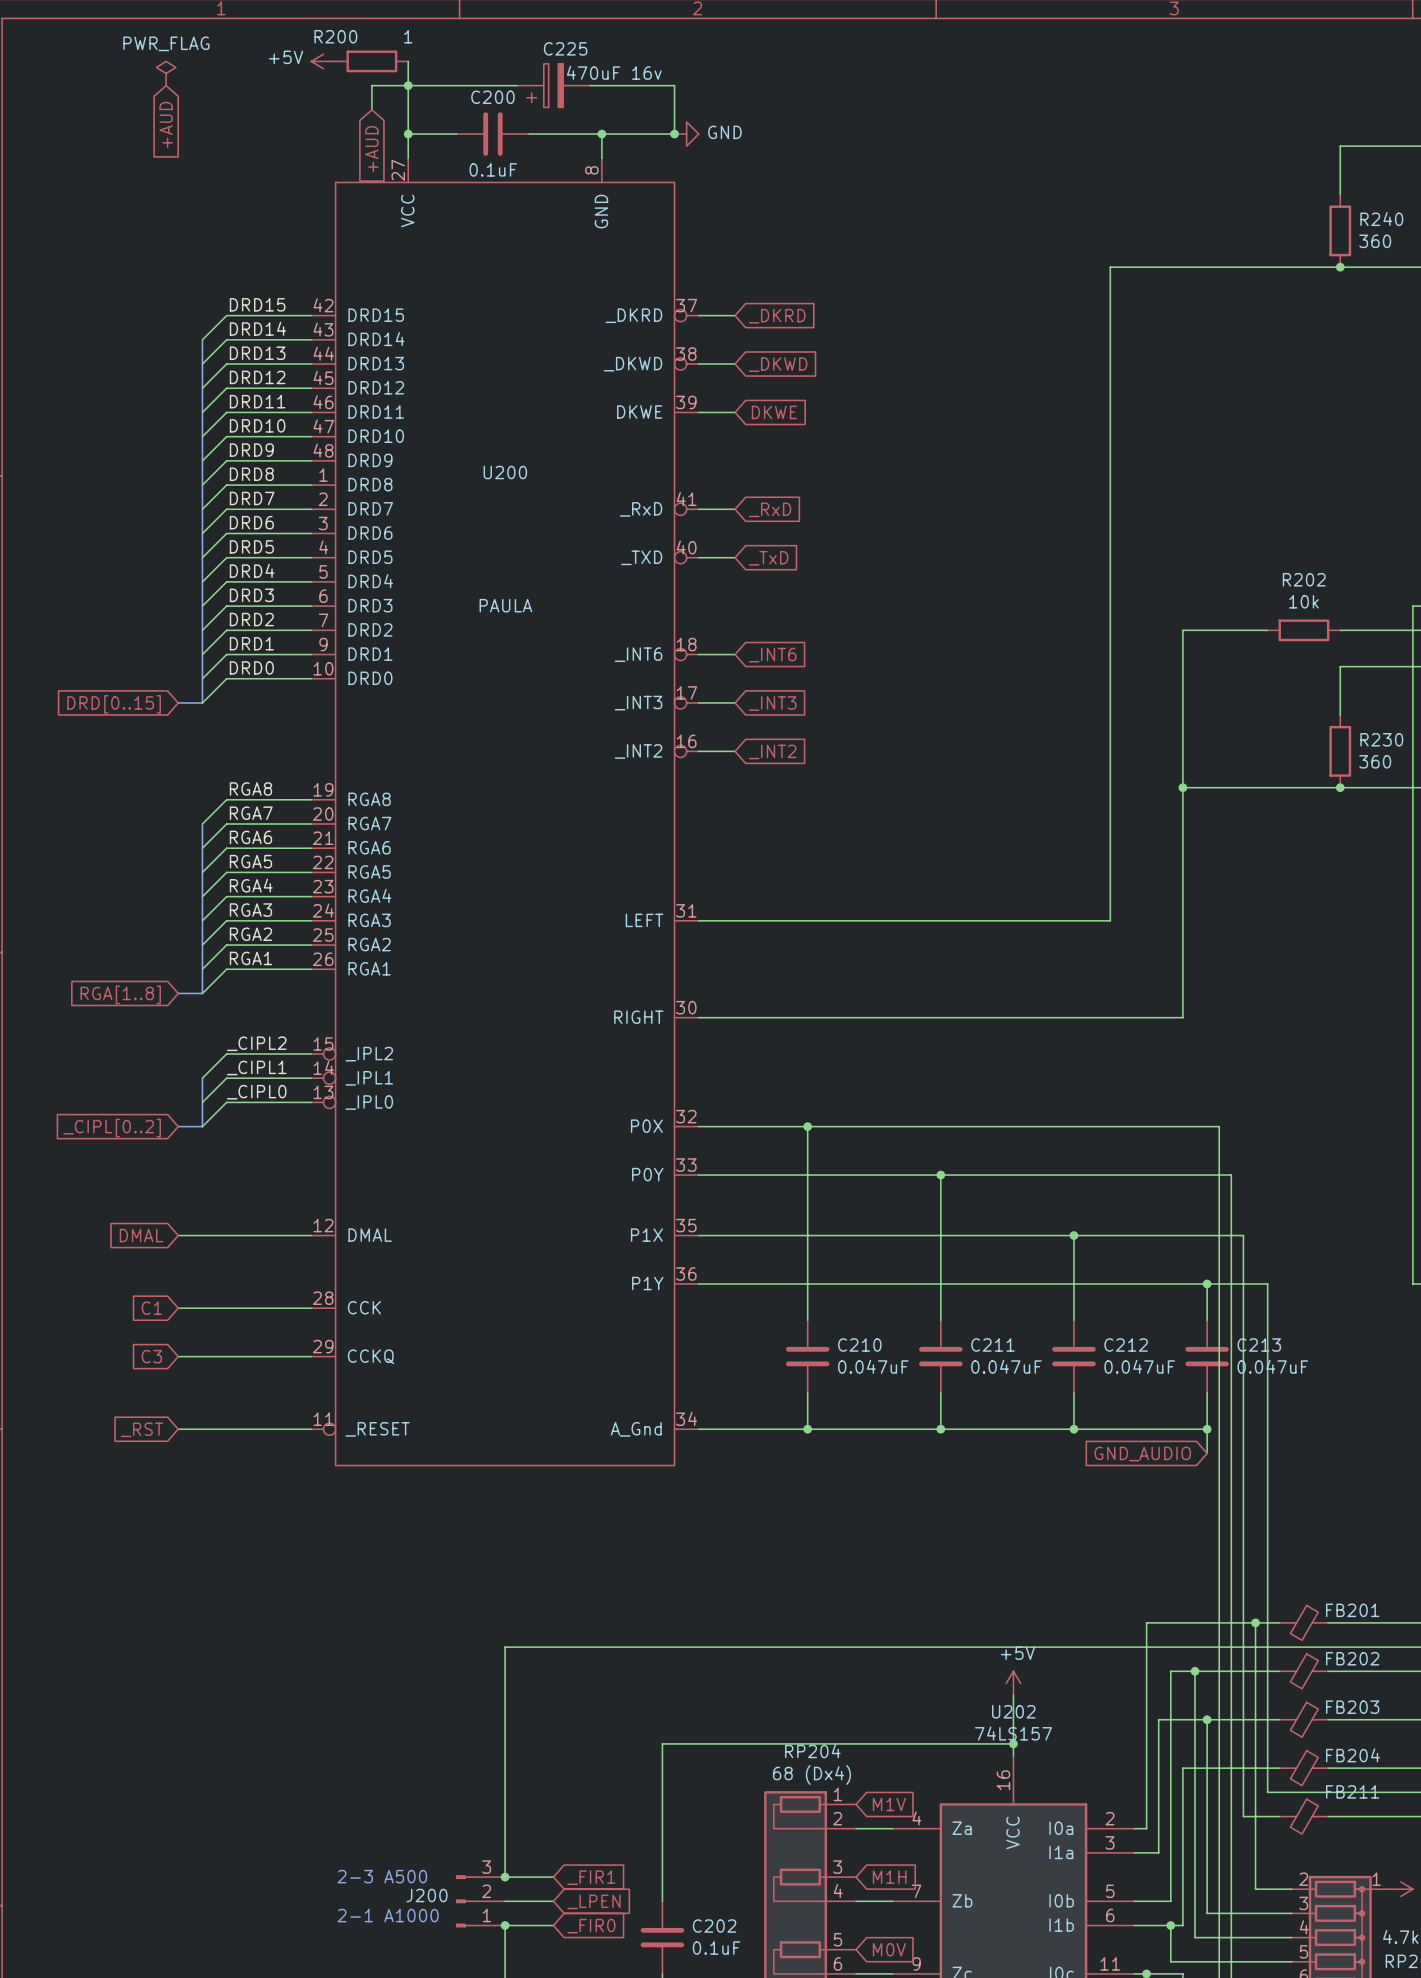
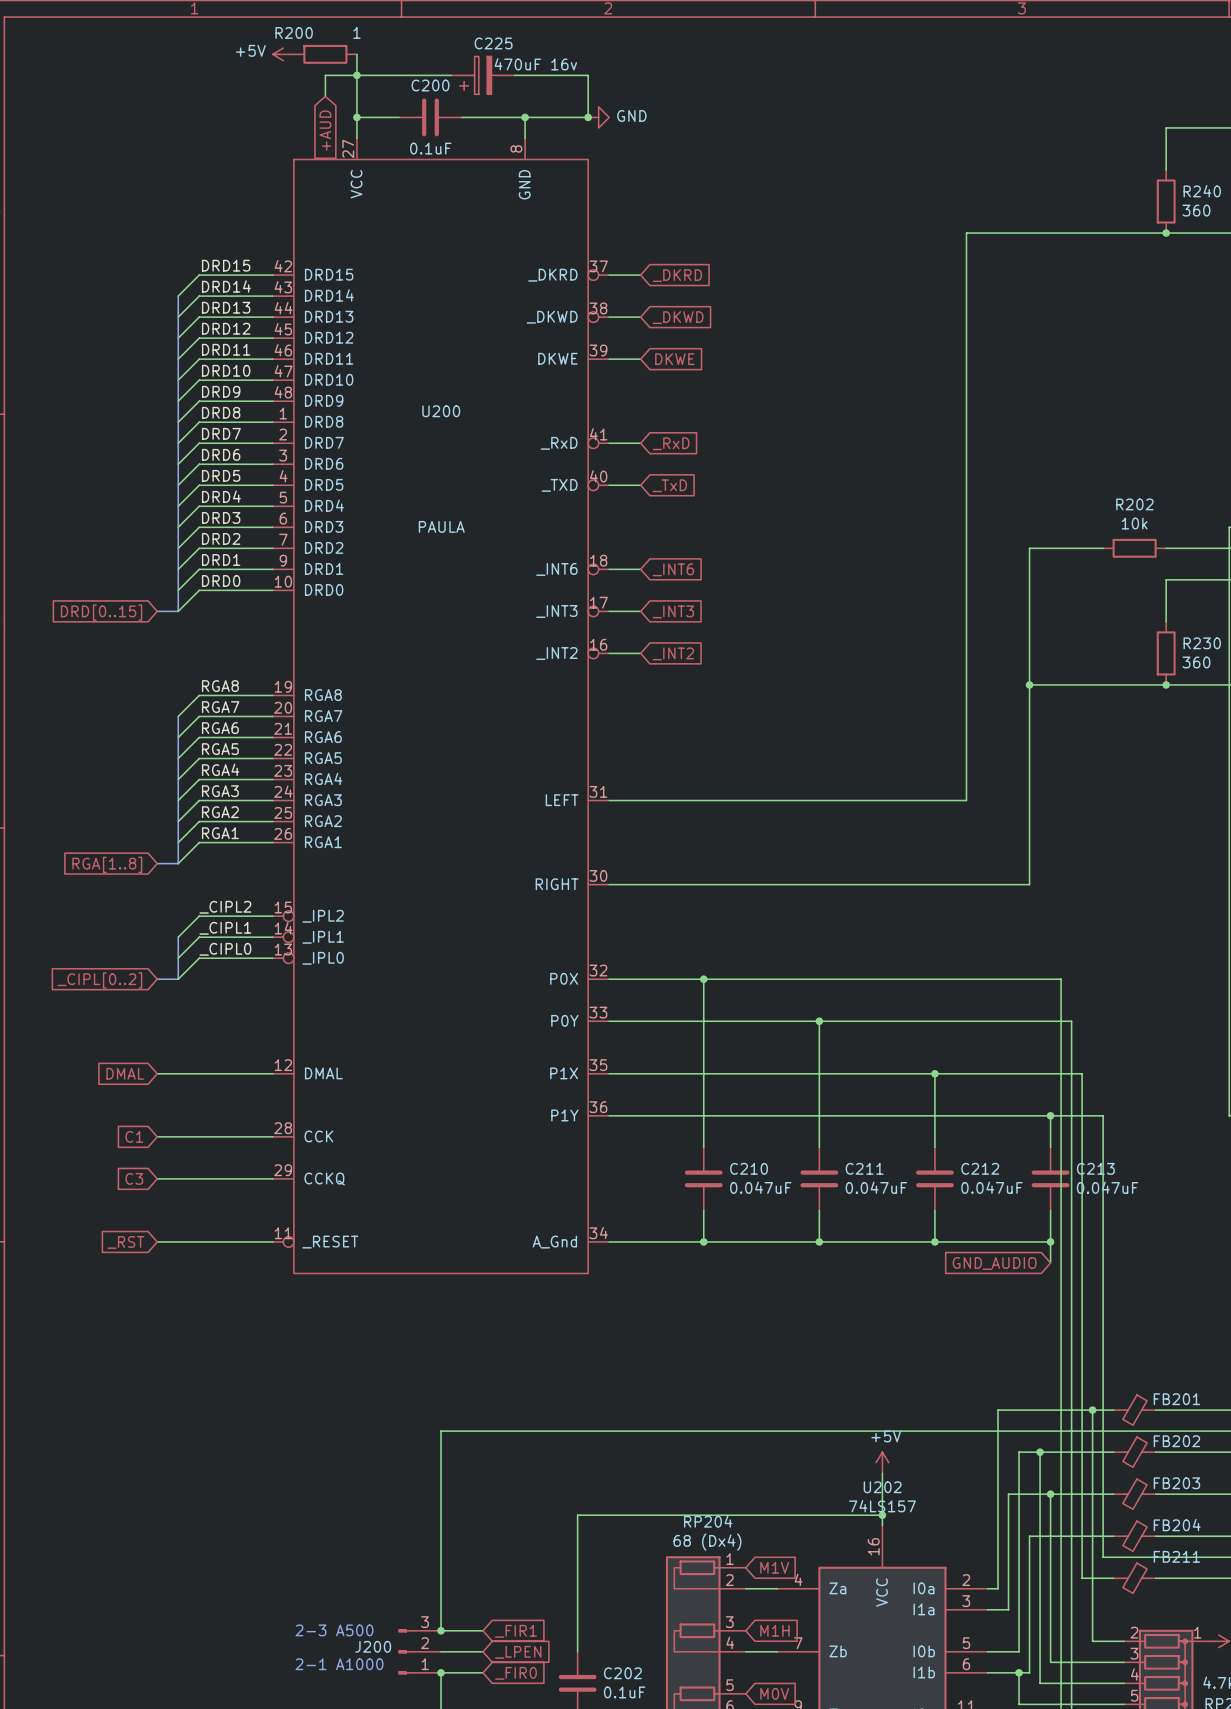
power symbol: PWR_FLAG (166, 73) -> none
global label: +AUD (166, 124) -> none

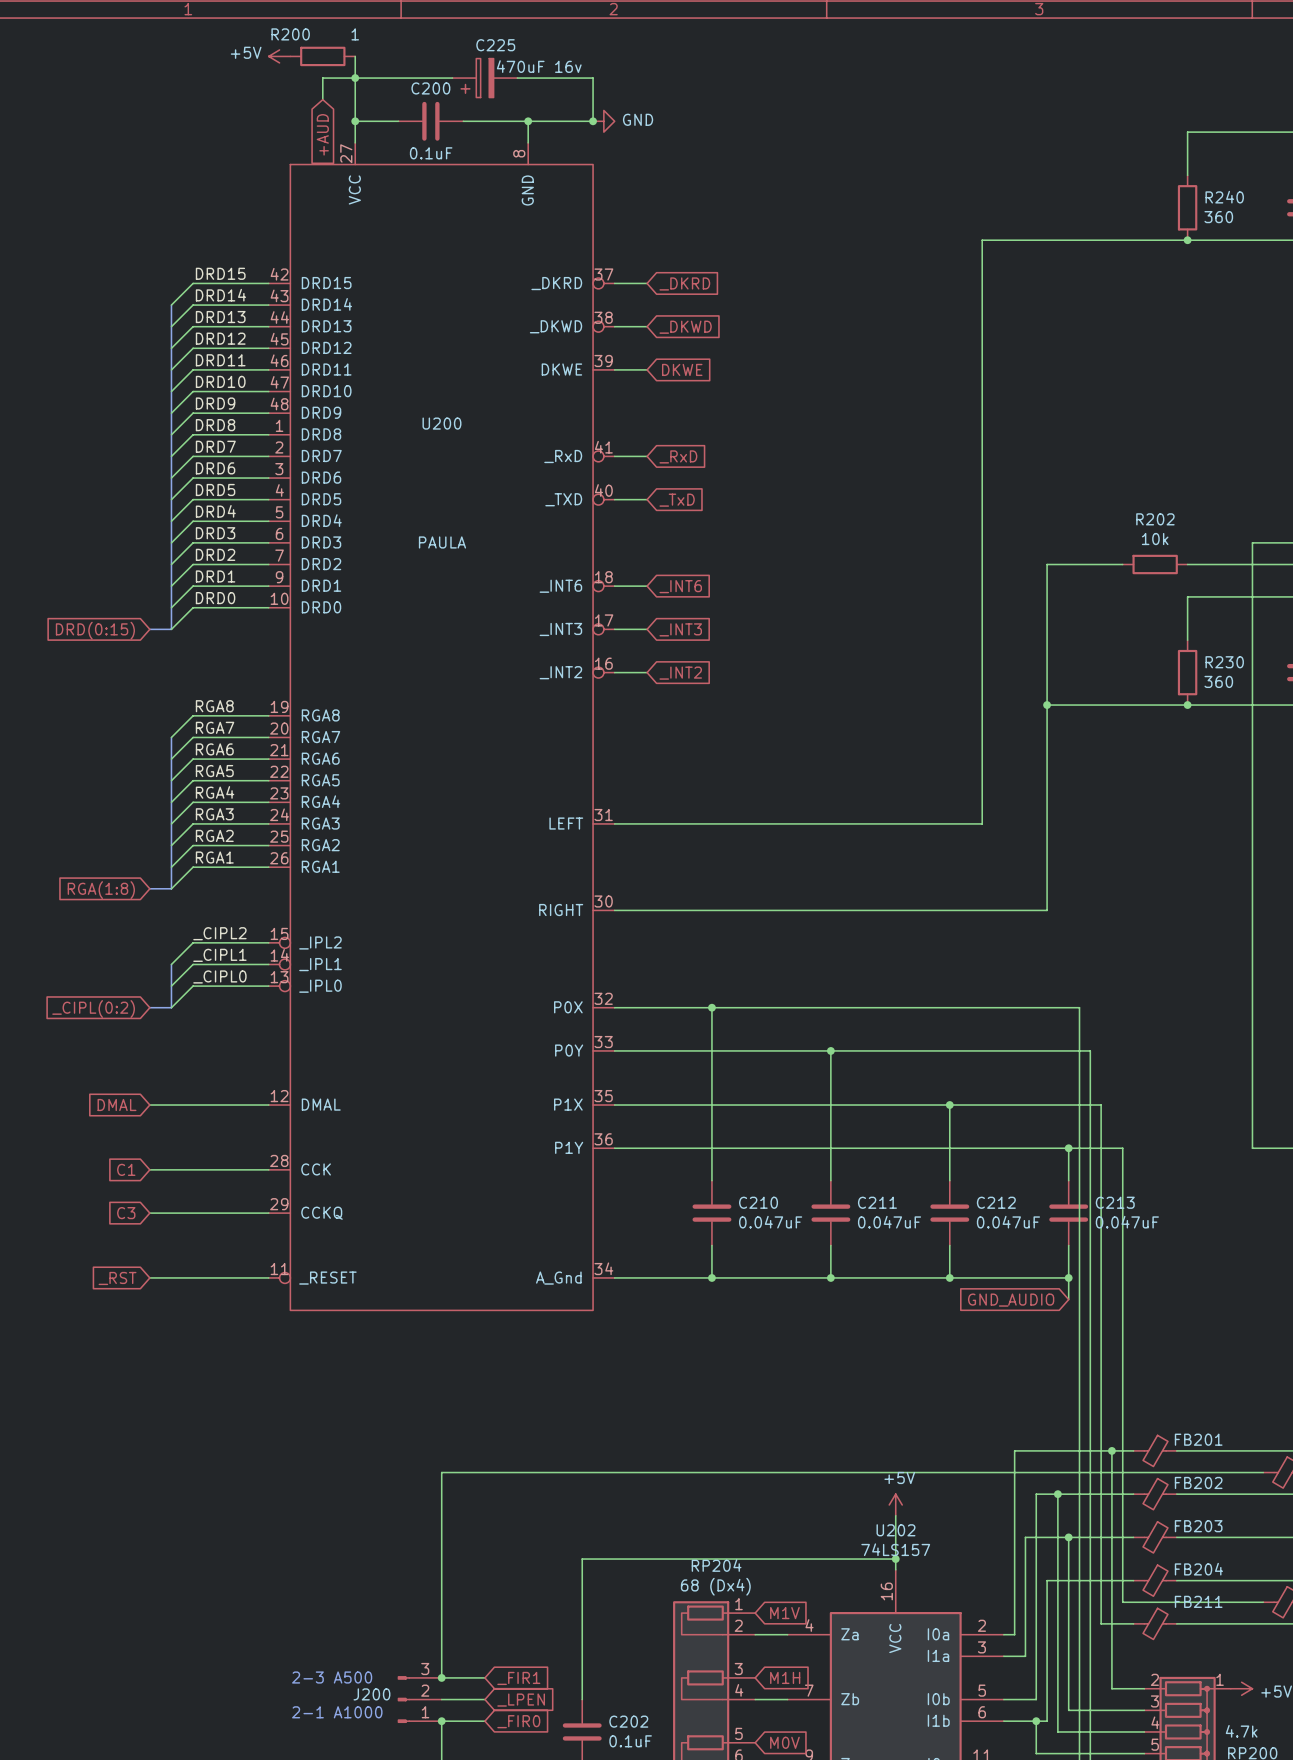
global label: DRD[0..15] (101, 612) -> DRD(0:15) (95, 630)
global label: RGA[1..8] (107, 864) -> RGA(1:8) (101, 890)
global label: _CIPL[0..2] (99, 980) -> _CIPL(0:2) (93, 1009)

